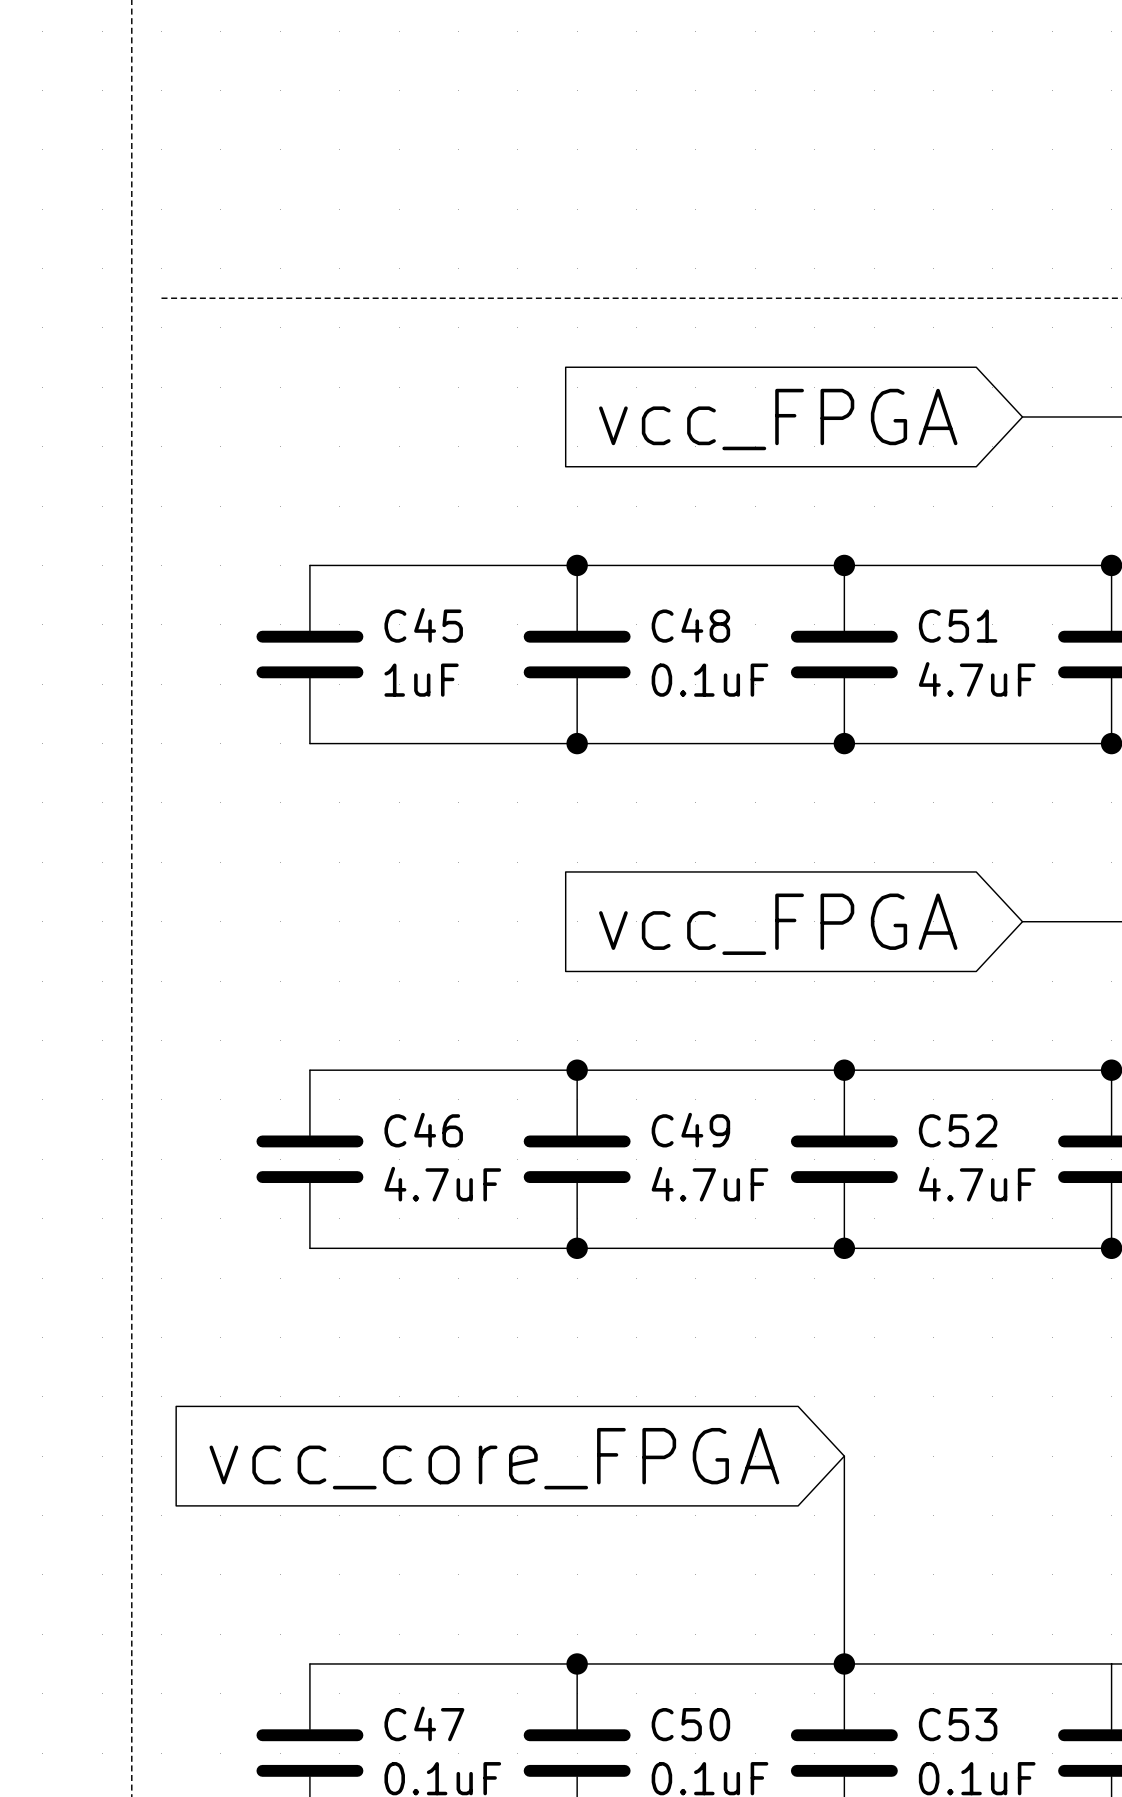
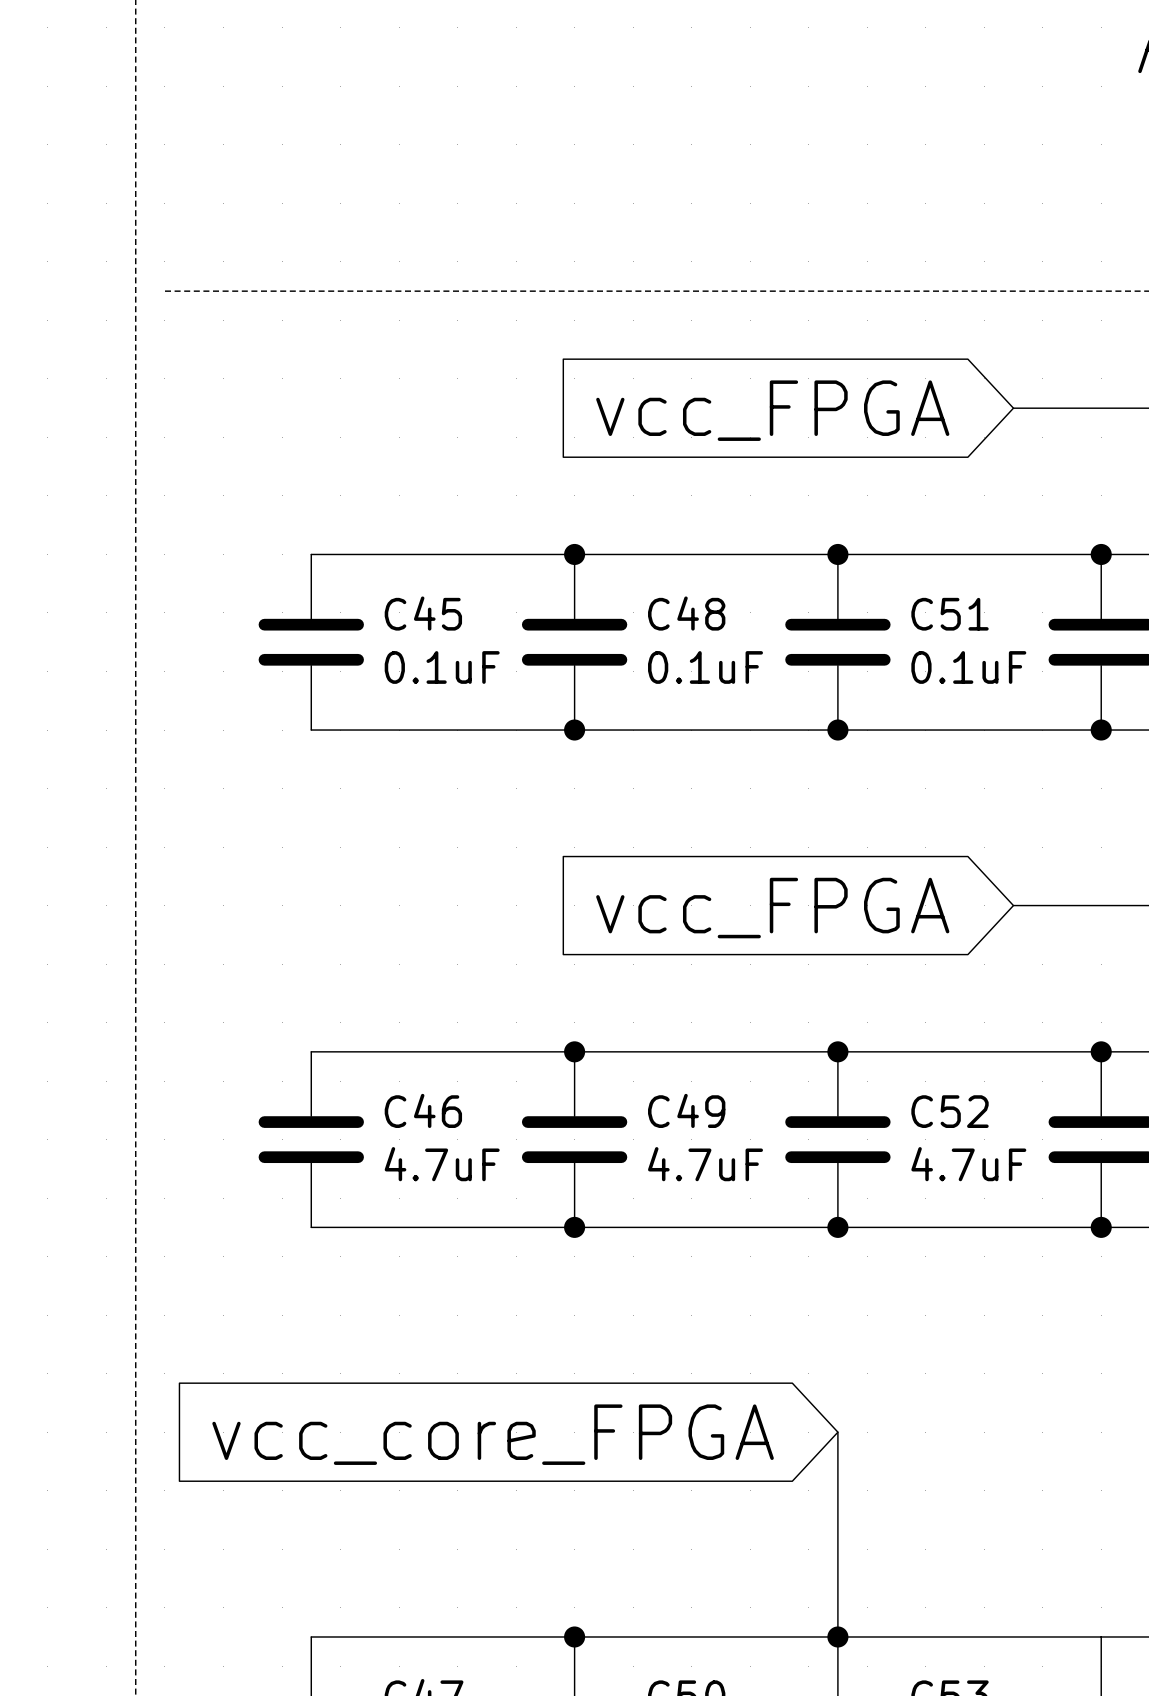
C51 value: 4.7uF (977, 679) -> 0.1uF (968, 667)
C45 value: 1uF (421, 680) -> 0.1uF (442, 667)

